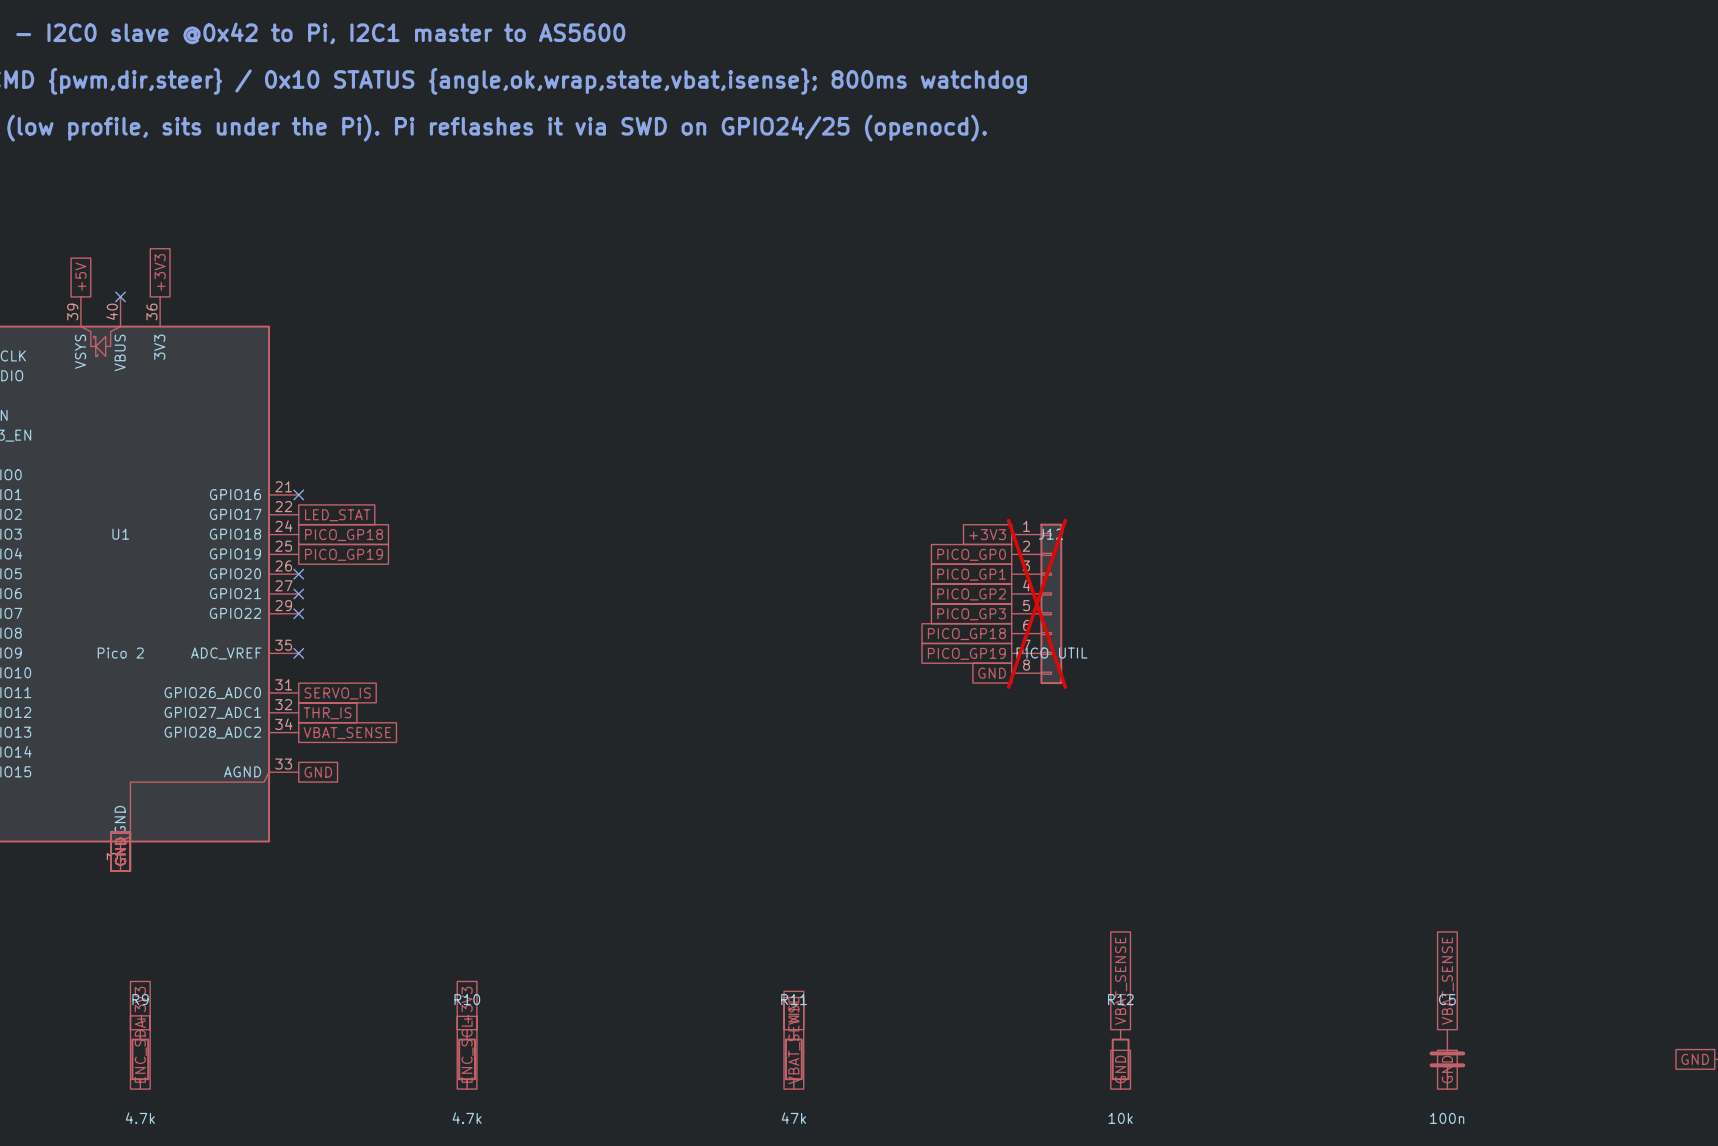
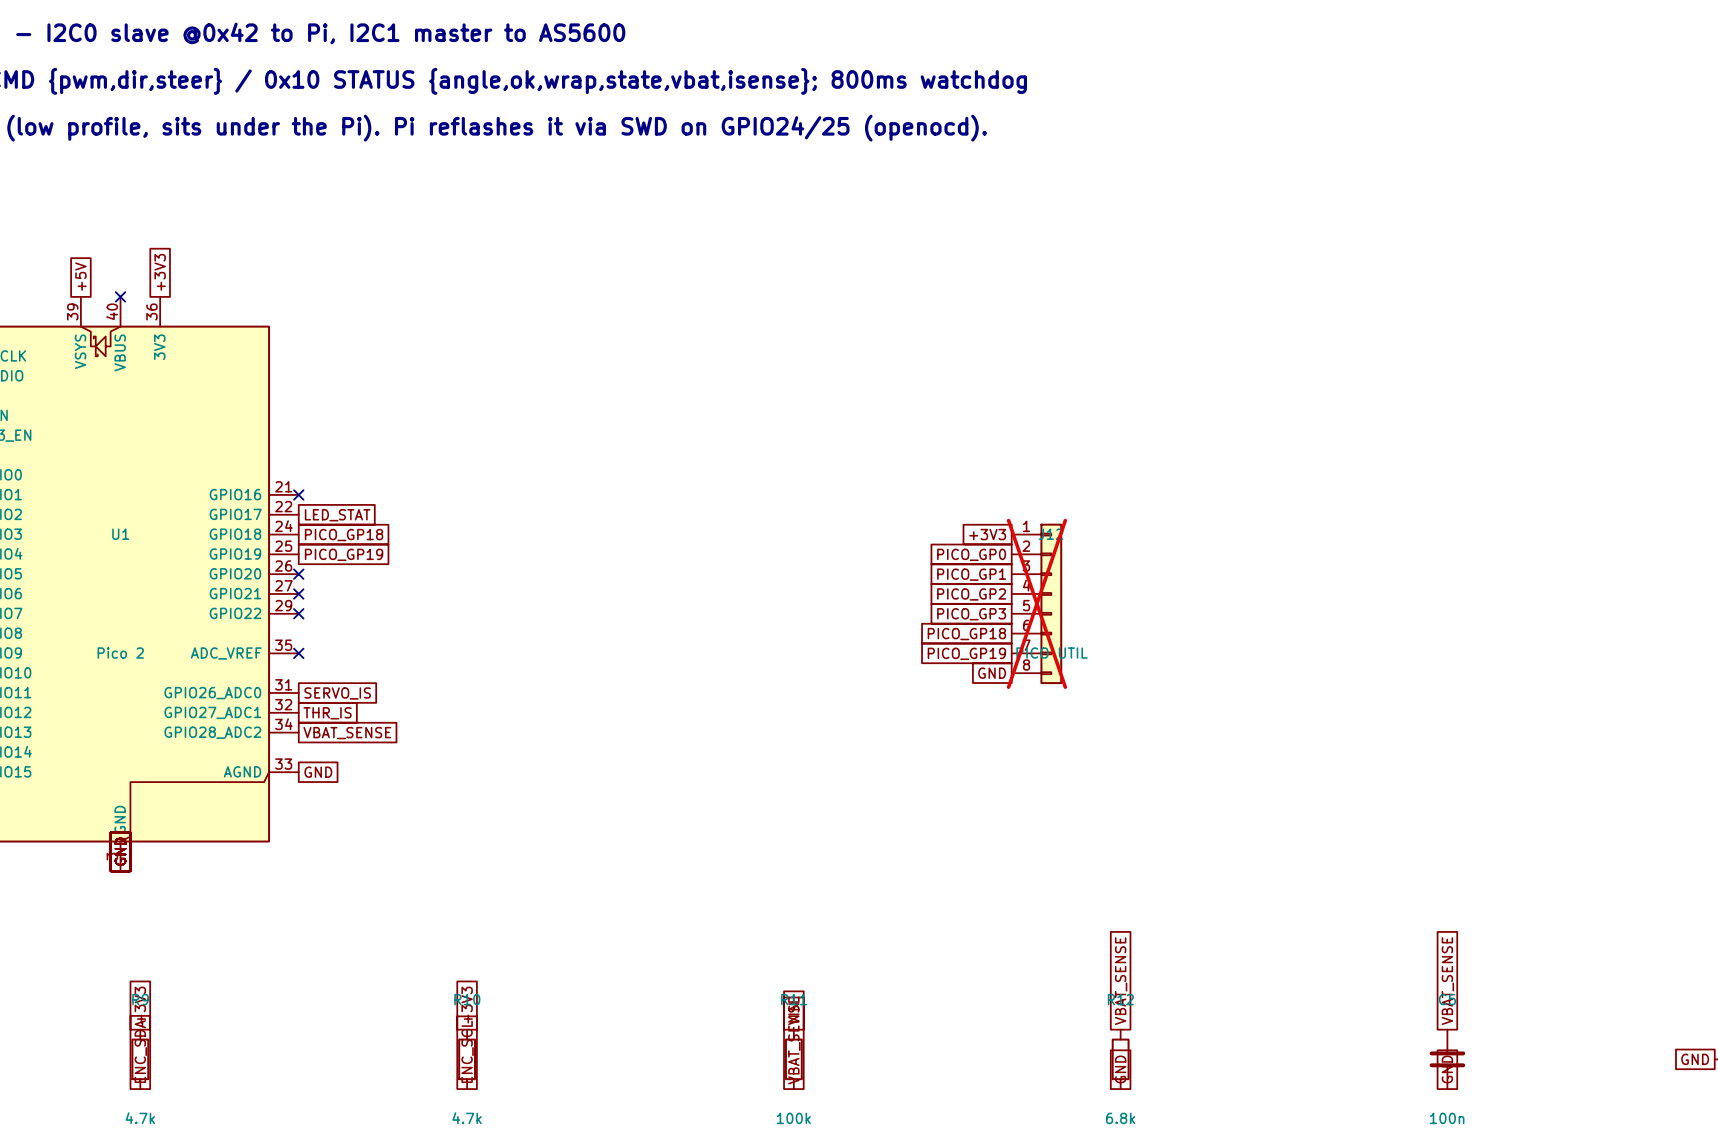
R11 value: 47k (793, 1118) -> 100k (793, 1118)
R12 value: 10k (1120, 1118) -> 6.8k (1120, 1118)

